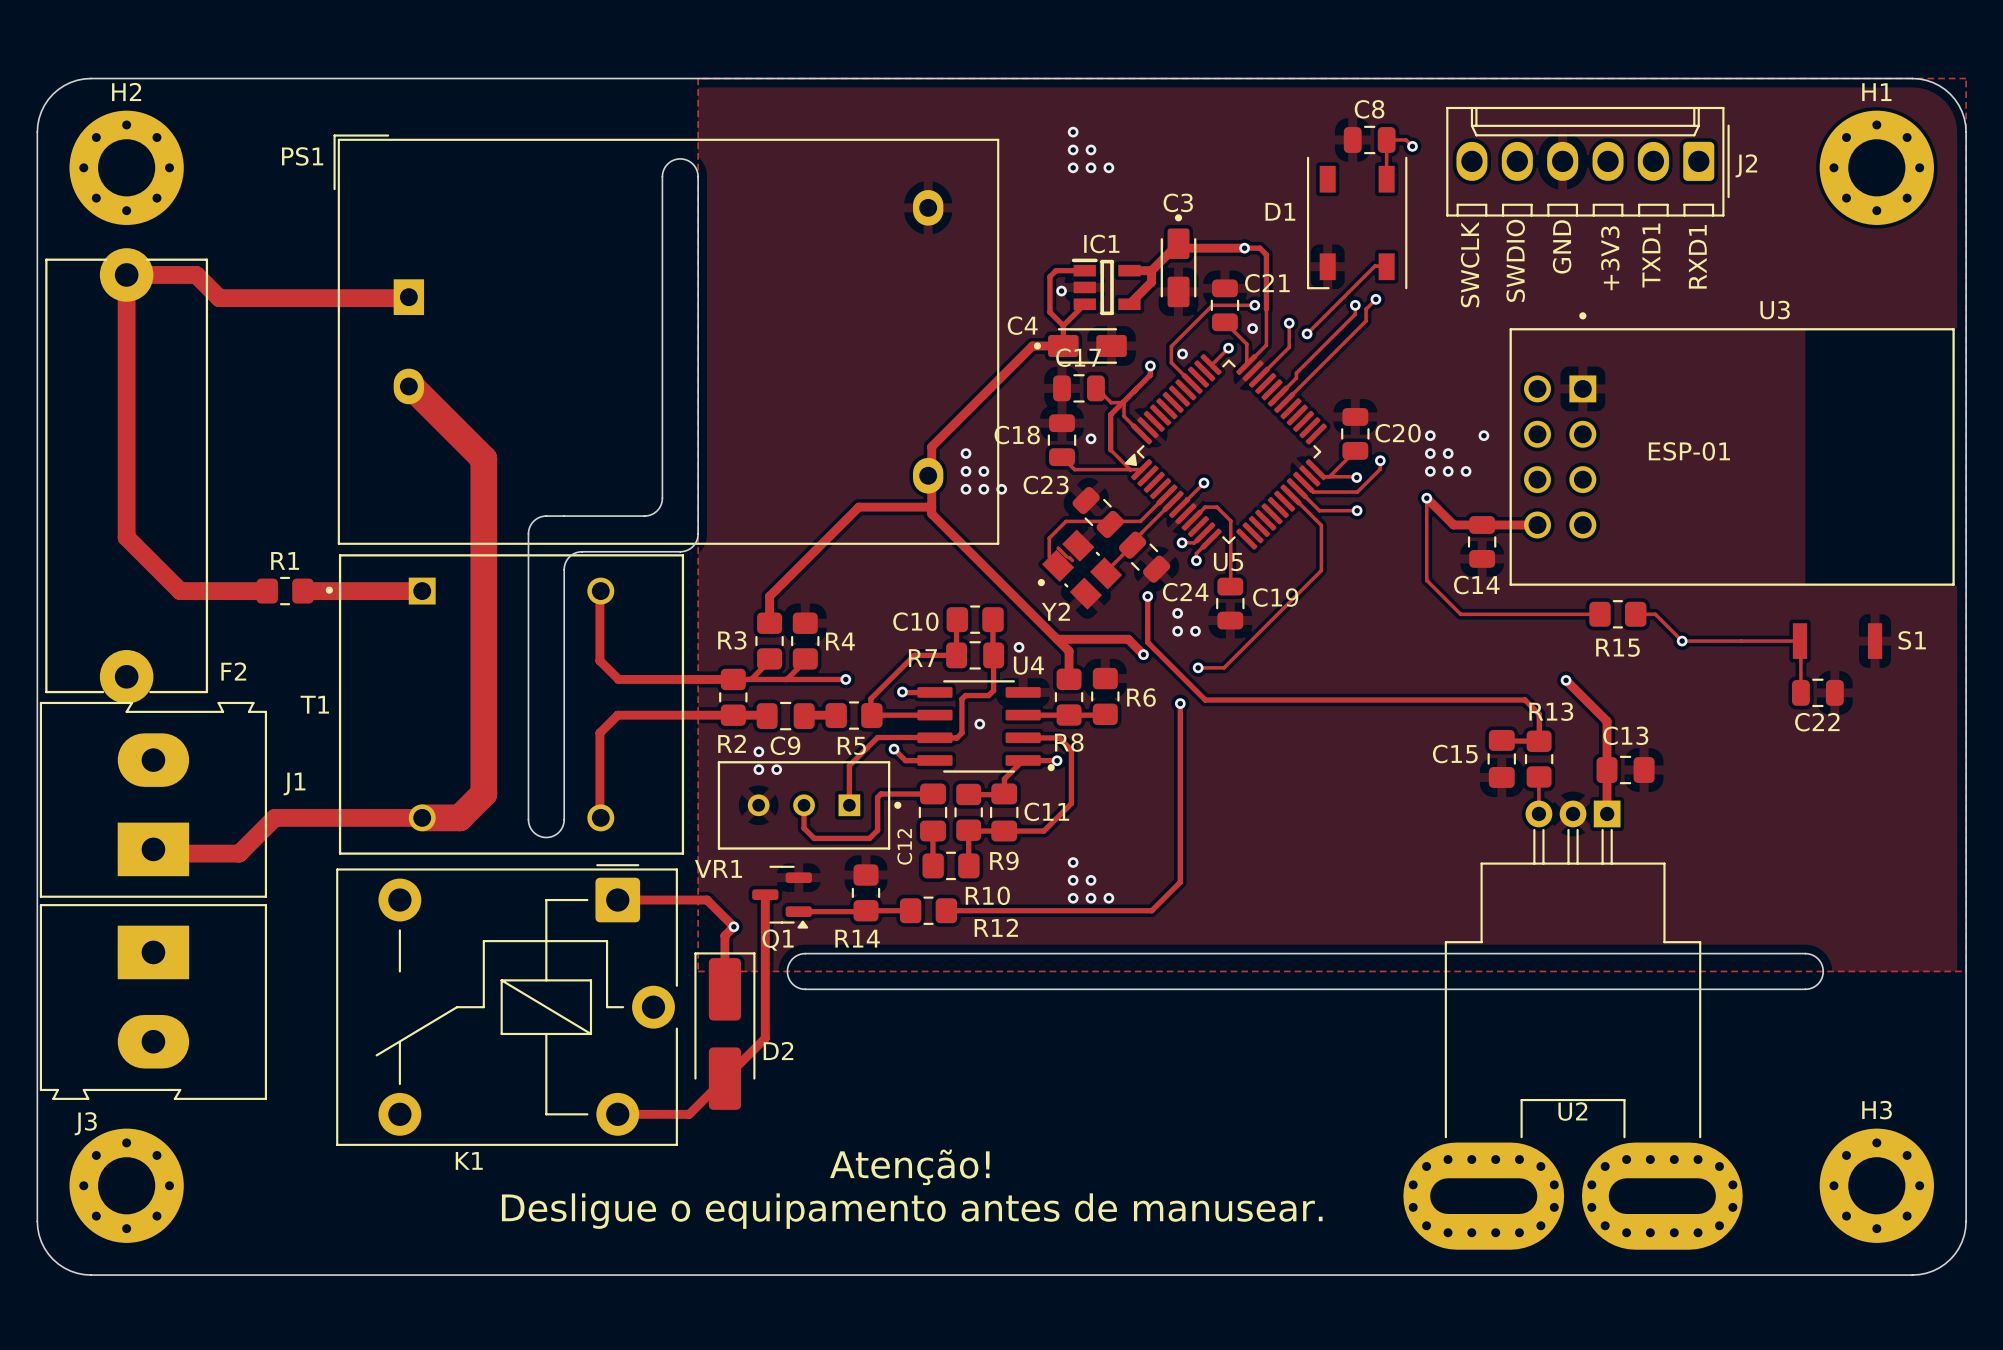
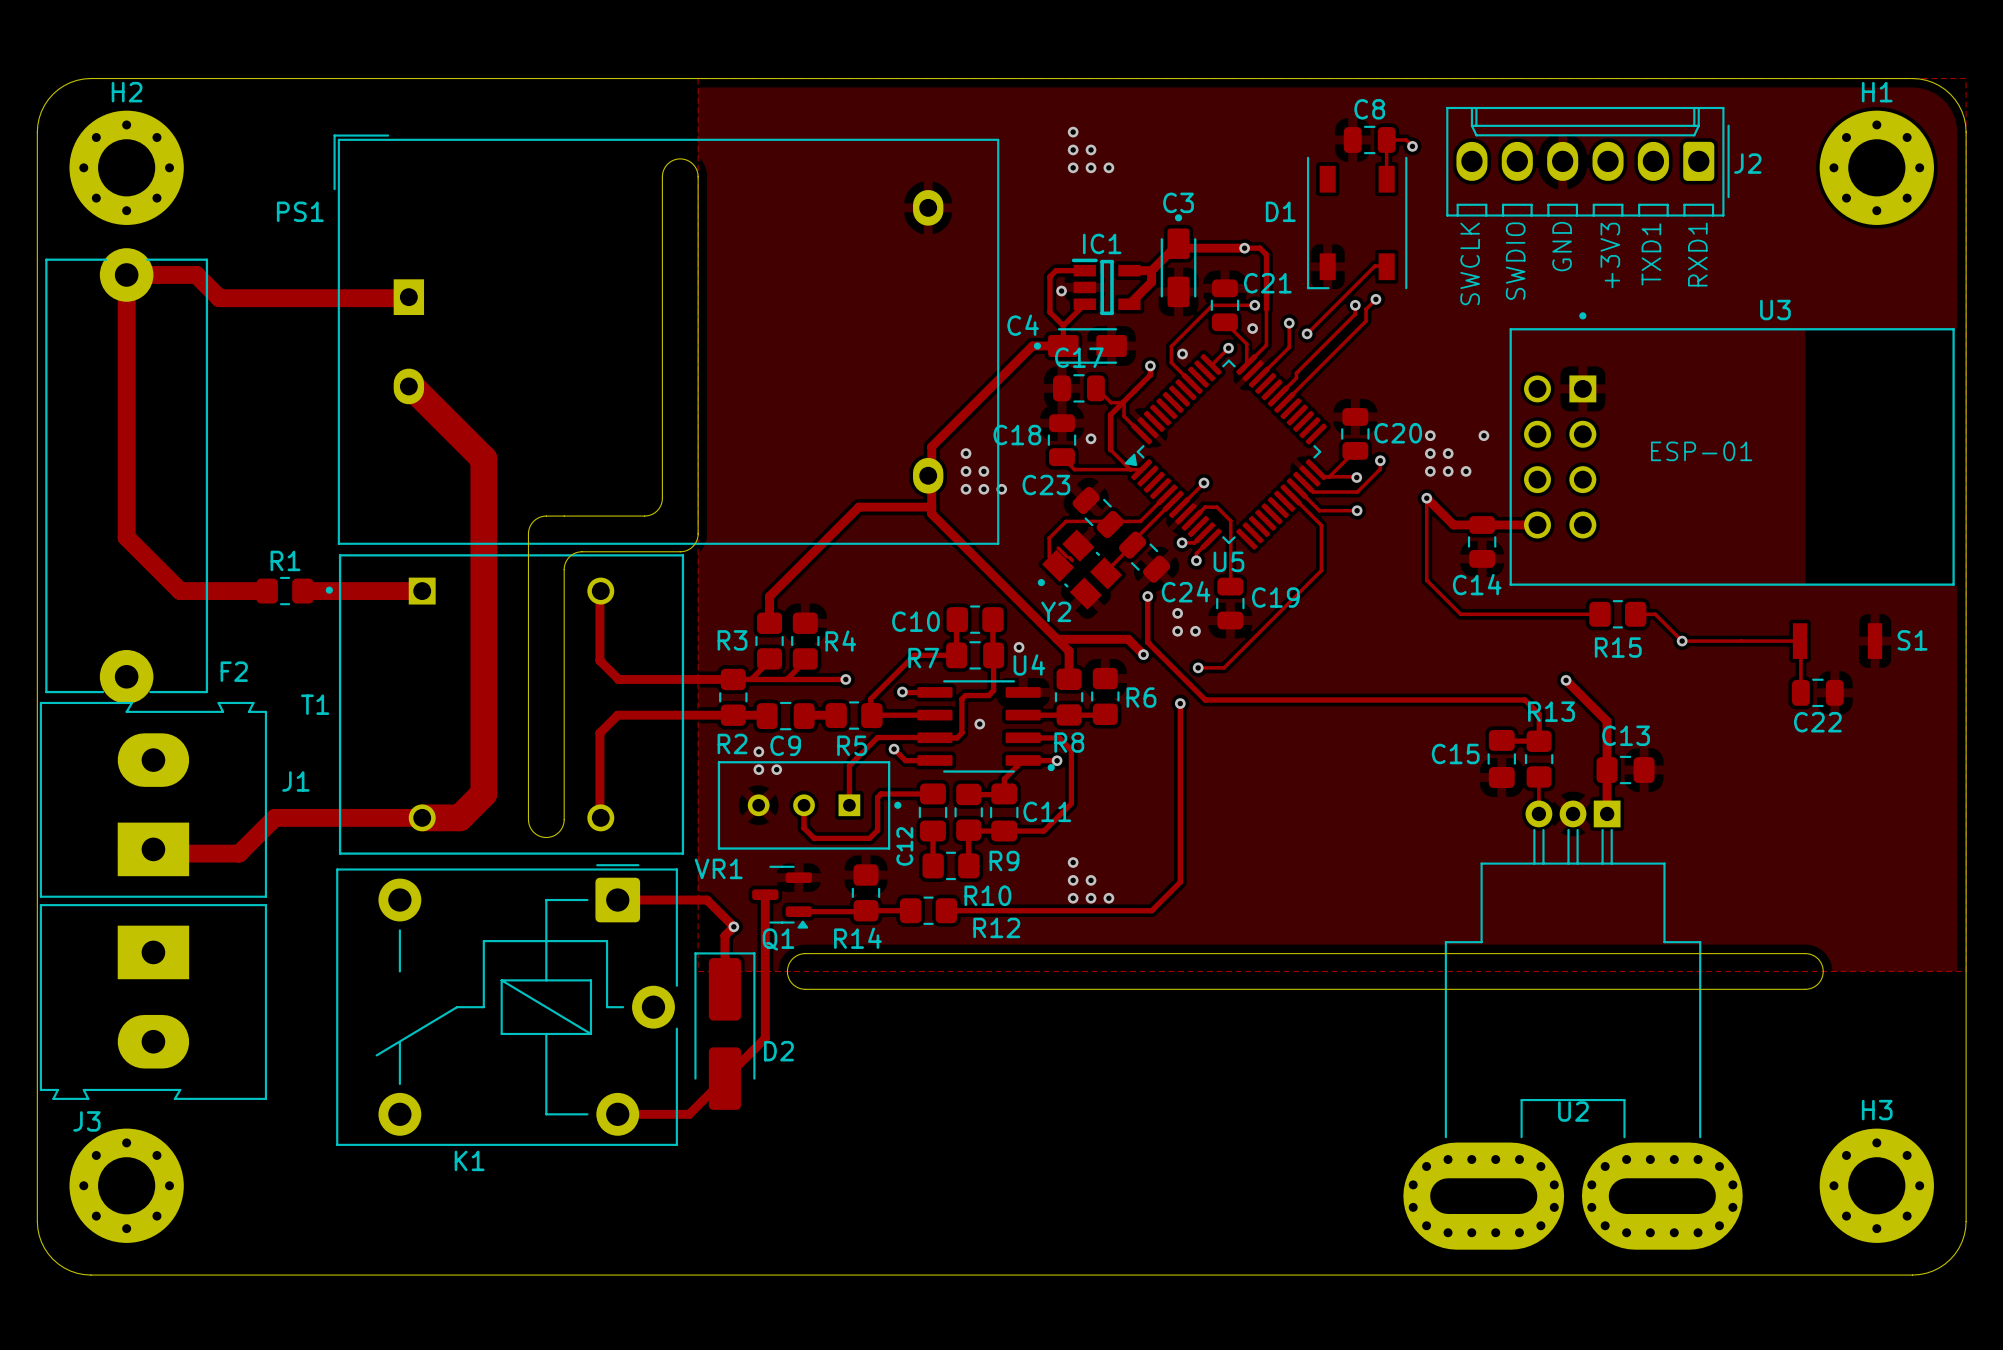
PS1 name position: PS1 (302, 156) -> PS1 (300, 211)
text: Atenção! (909, 1167) -> none
text: Desligue o equipamento antes de manusear. (912, 1211) -> none

